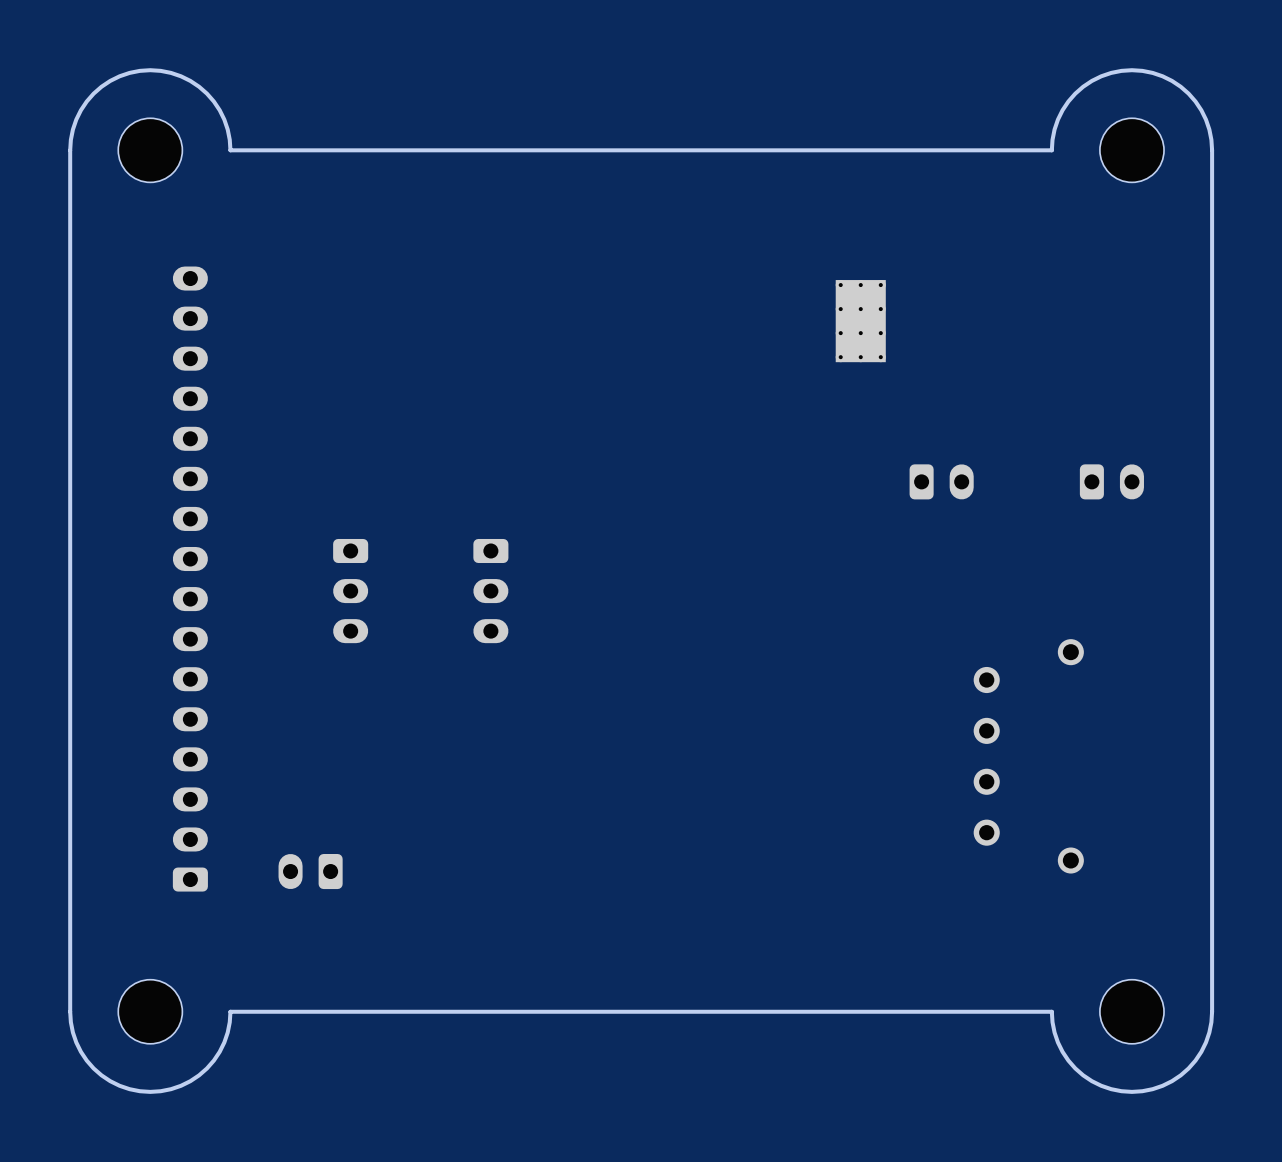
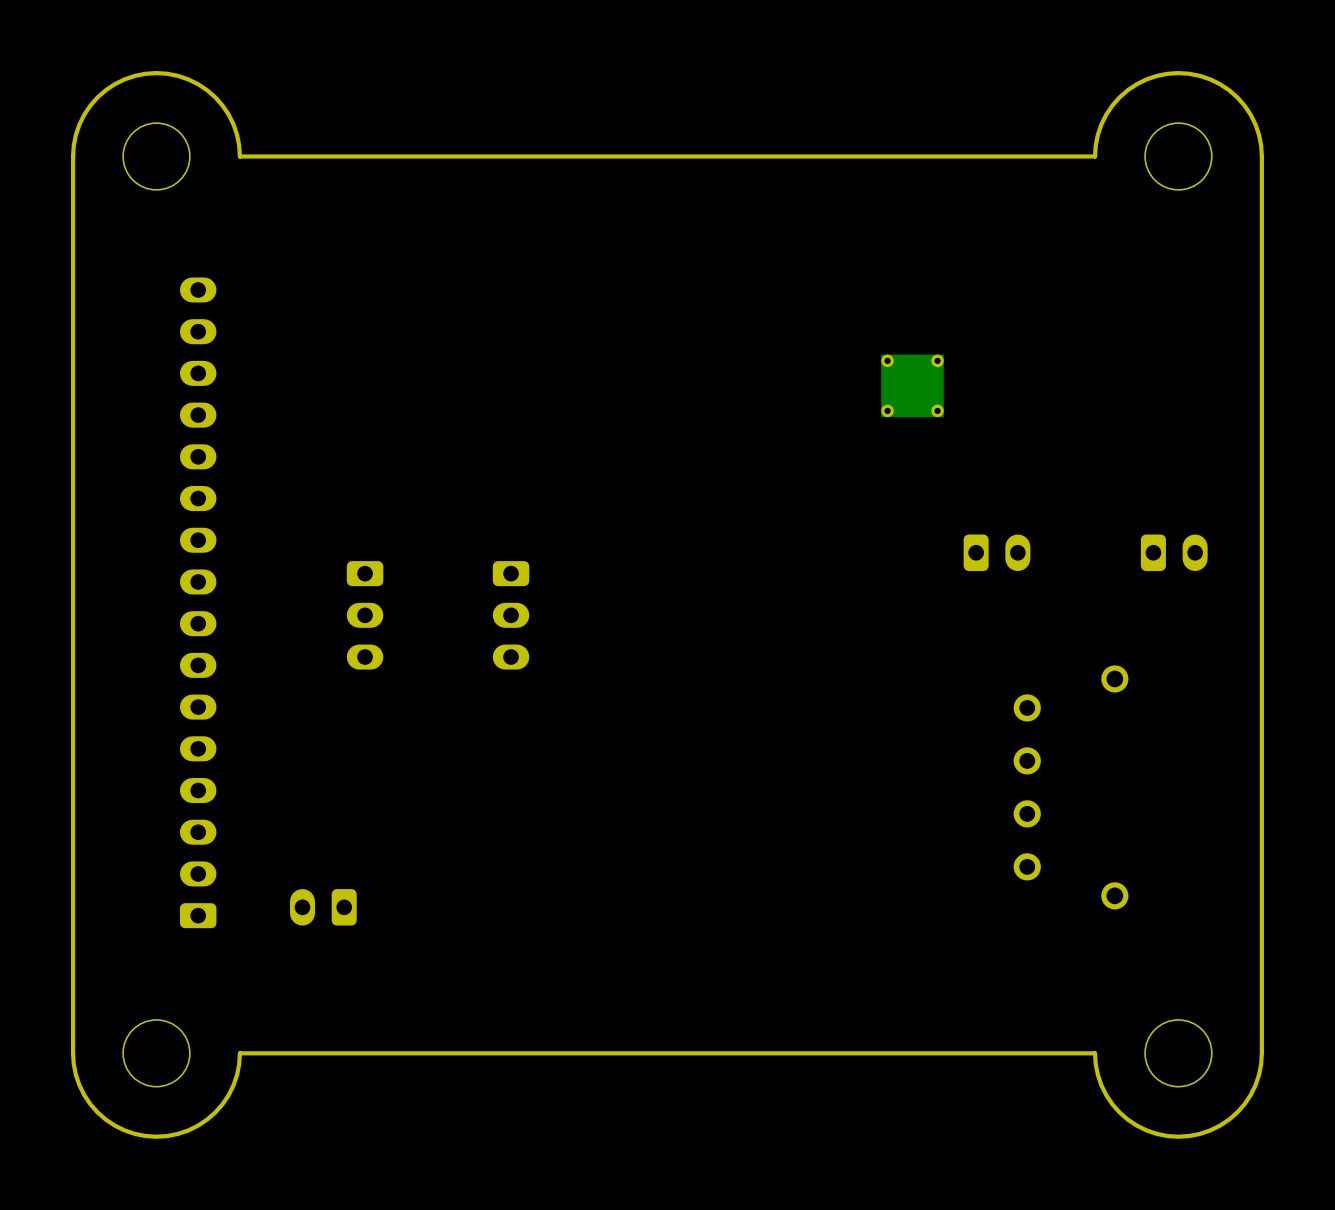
part: (860, 321) -> none
part: none -> (912, 385)
part position: (941, 481) -> (997, 552)
part position: (1111, 481) -> (1174, 552)

